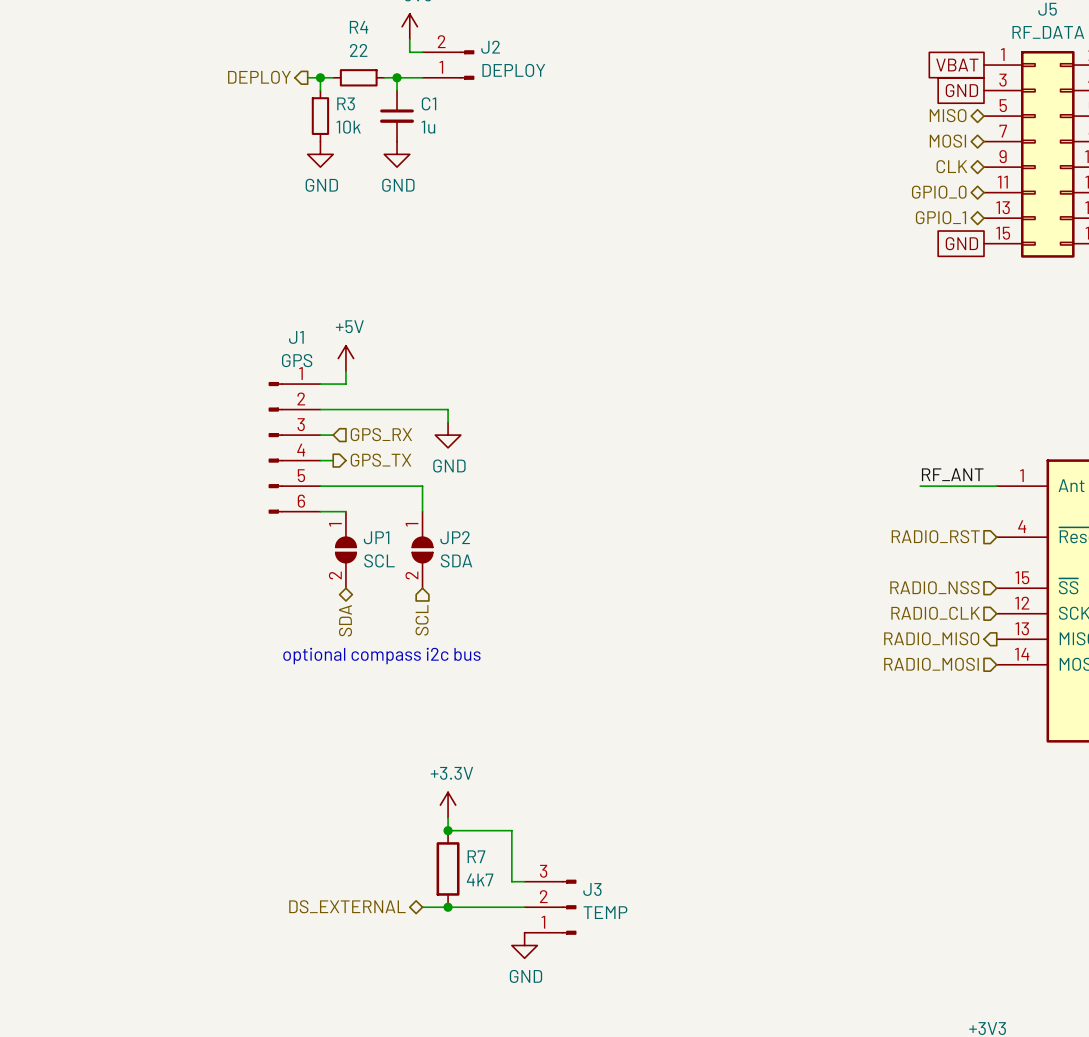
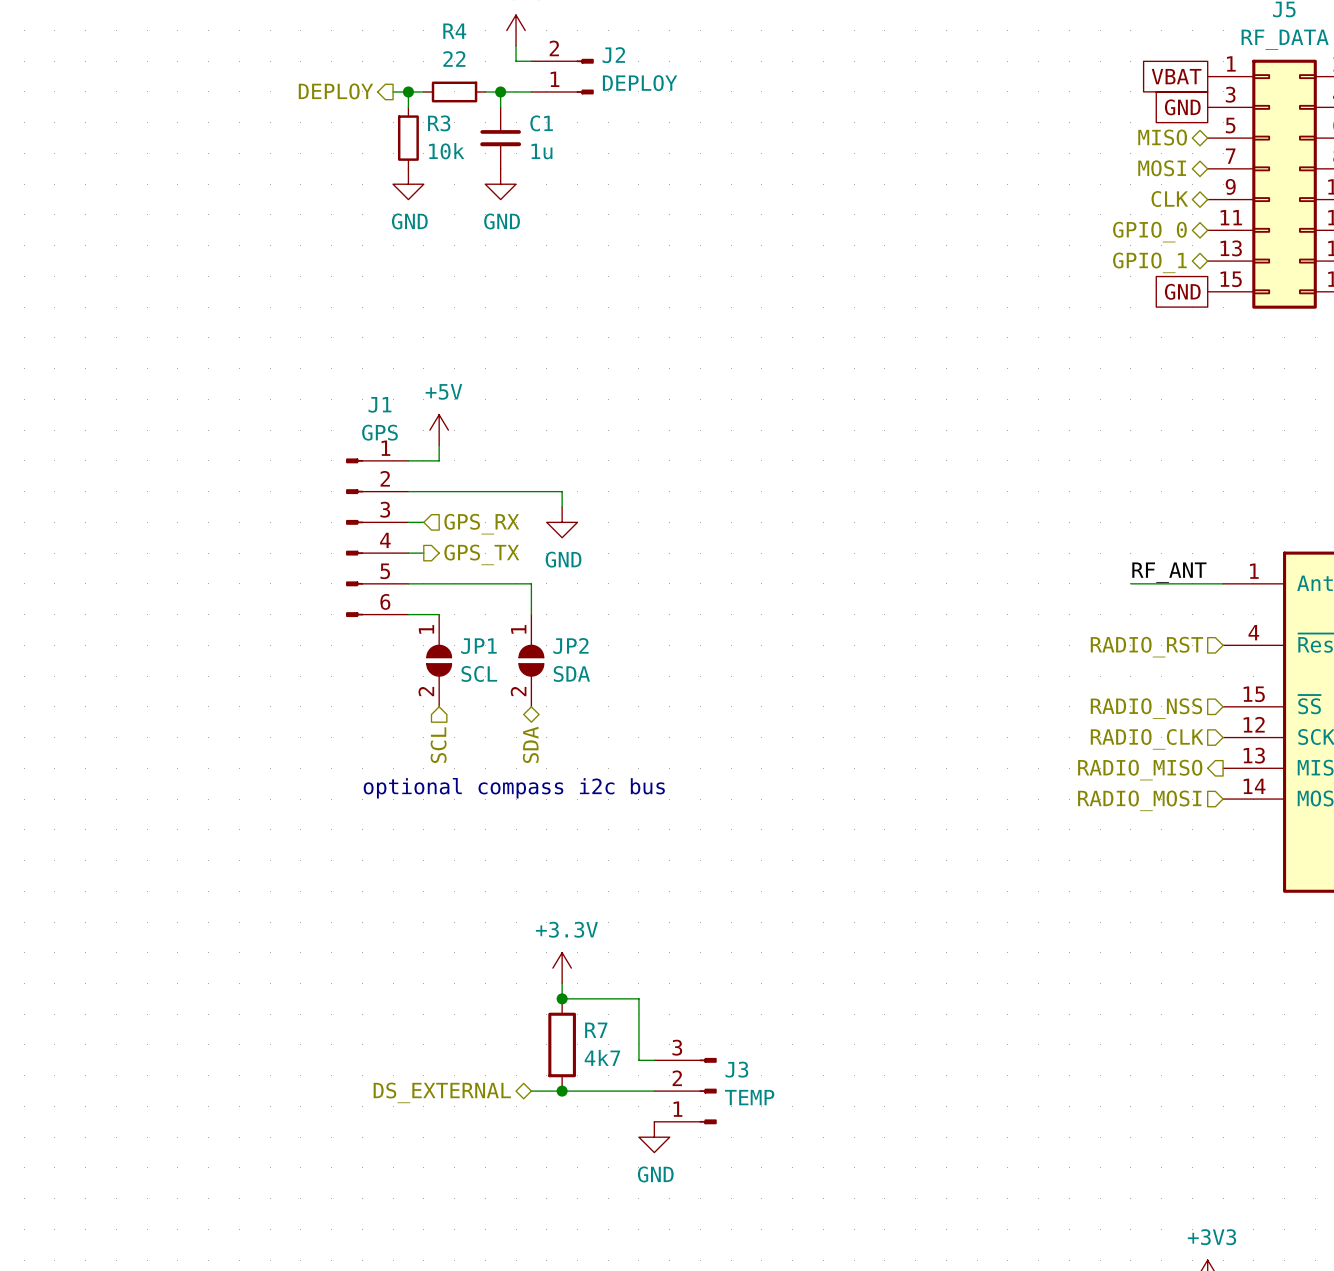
hierarchical label shape: bidirectional (345, 620) -> input (438, 745)
hierarchical label: SDA (345, 620) -> SCL (438, 745)
hierarchical label shape: input (422, 620) -> bidirectional (530, 744)
hierarchical label: SCL (422, 620) -> SDA (530, 744)

